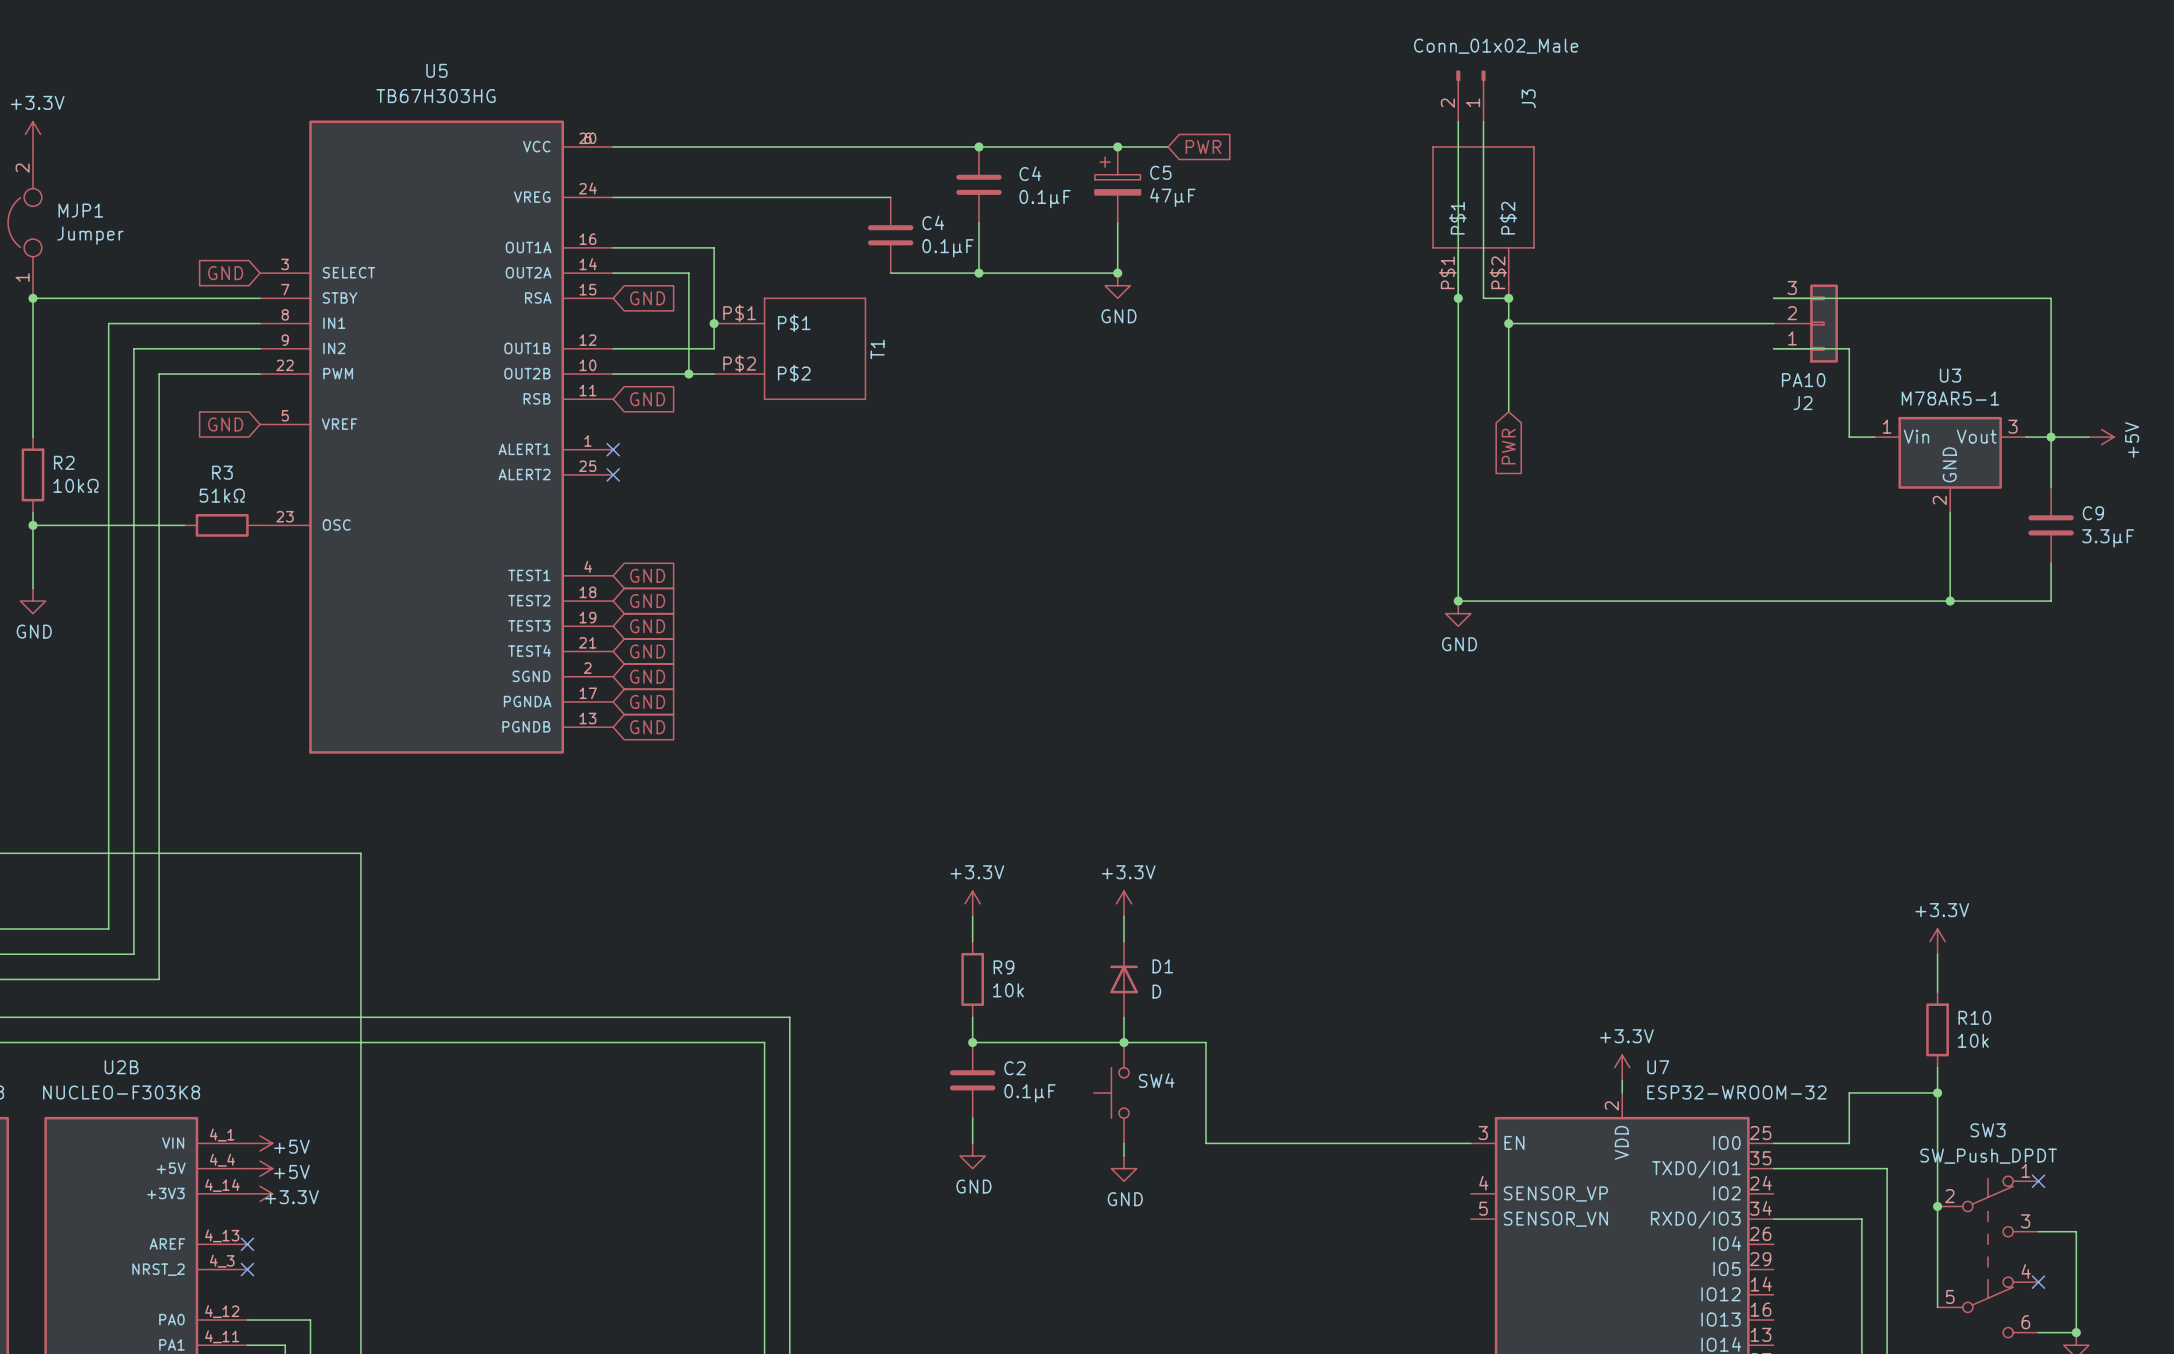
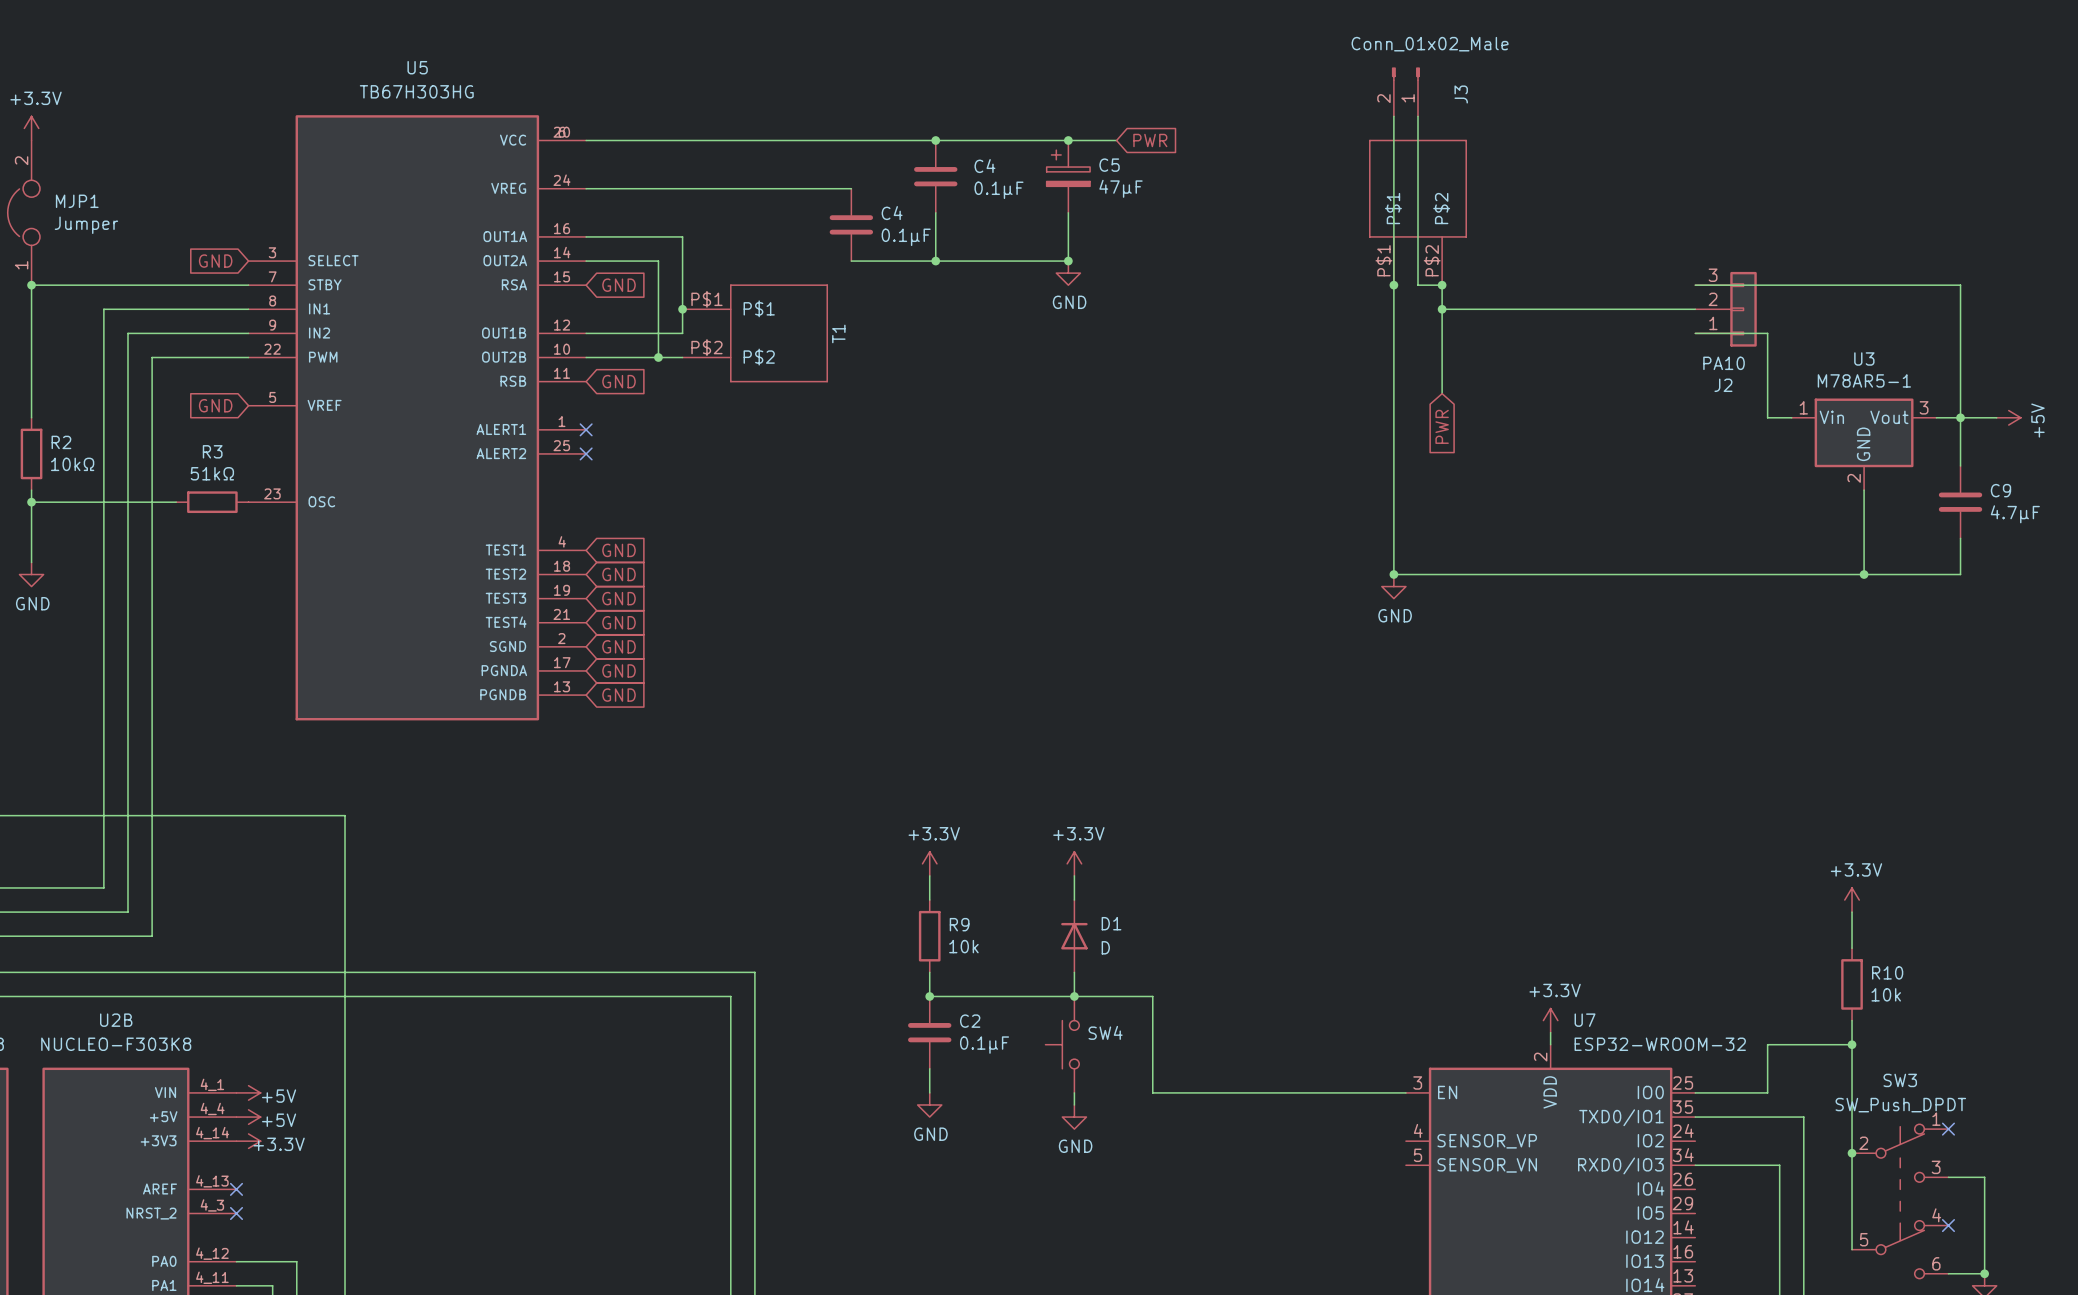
C9 value: 3.3μF (2108, 538) -> 4.7μF (2015, 514)

